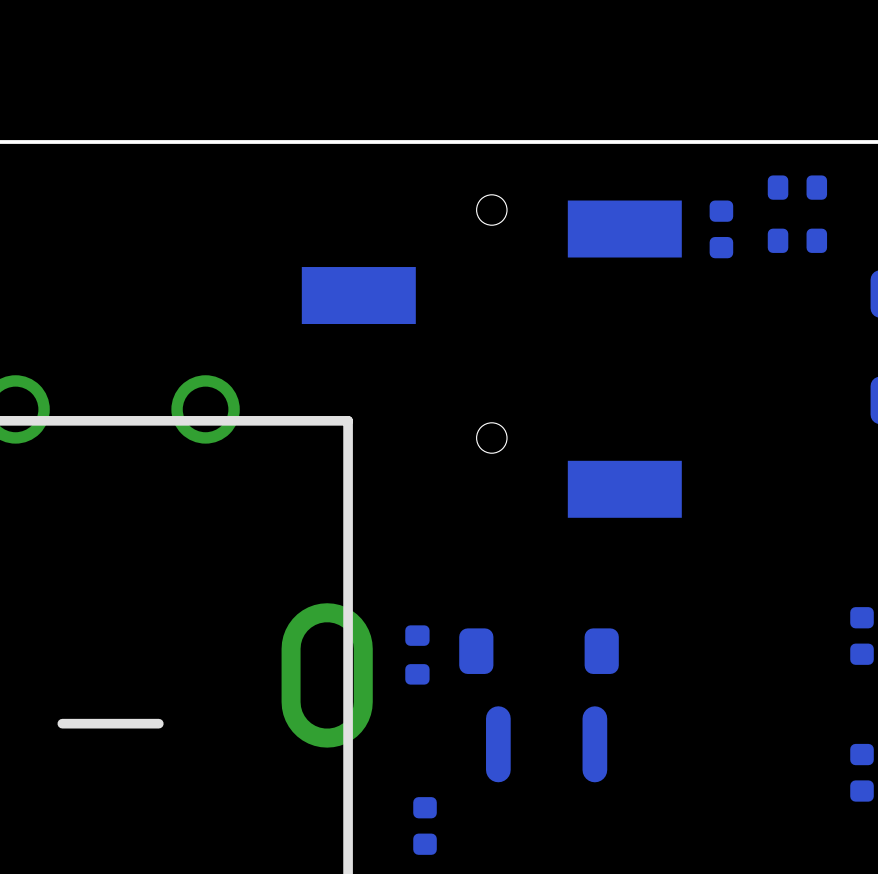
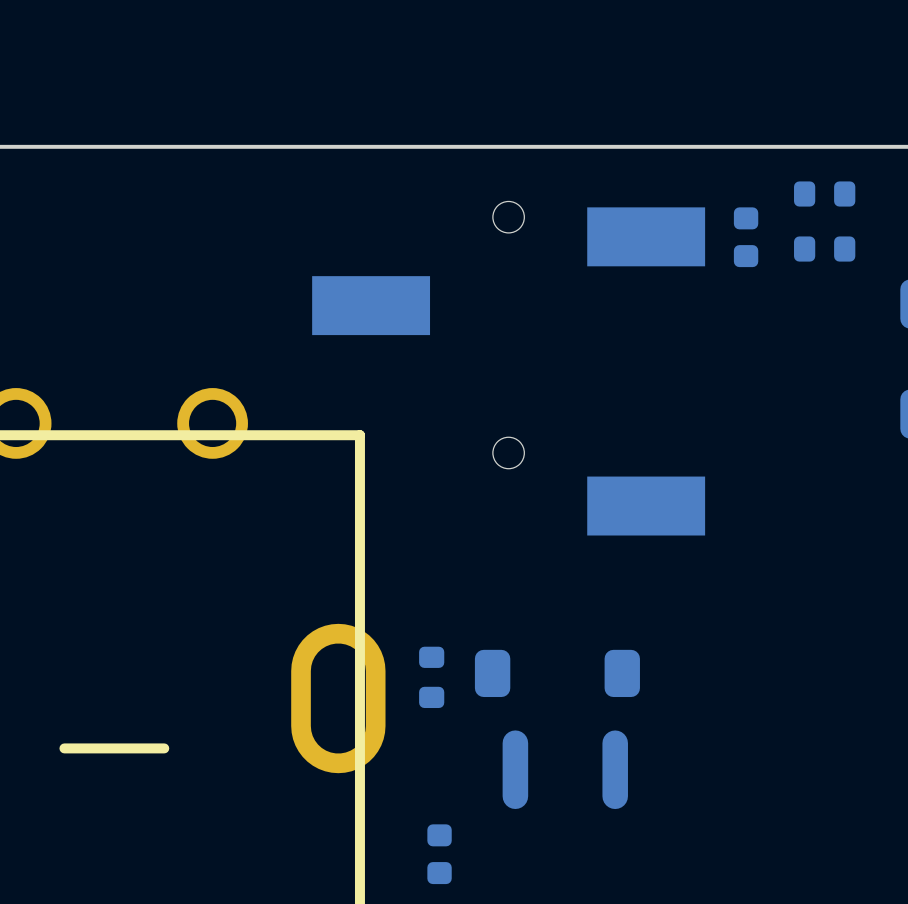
part: (862, 635) -> none
part: (862, 772) -> none

